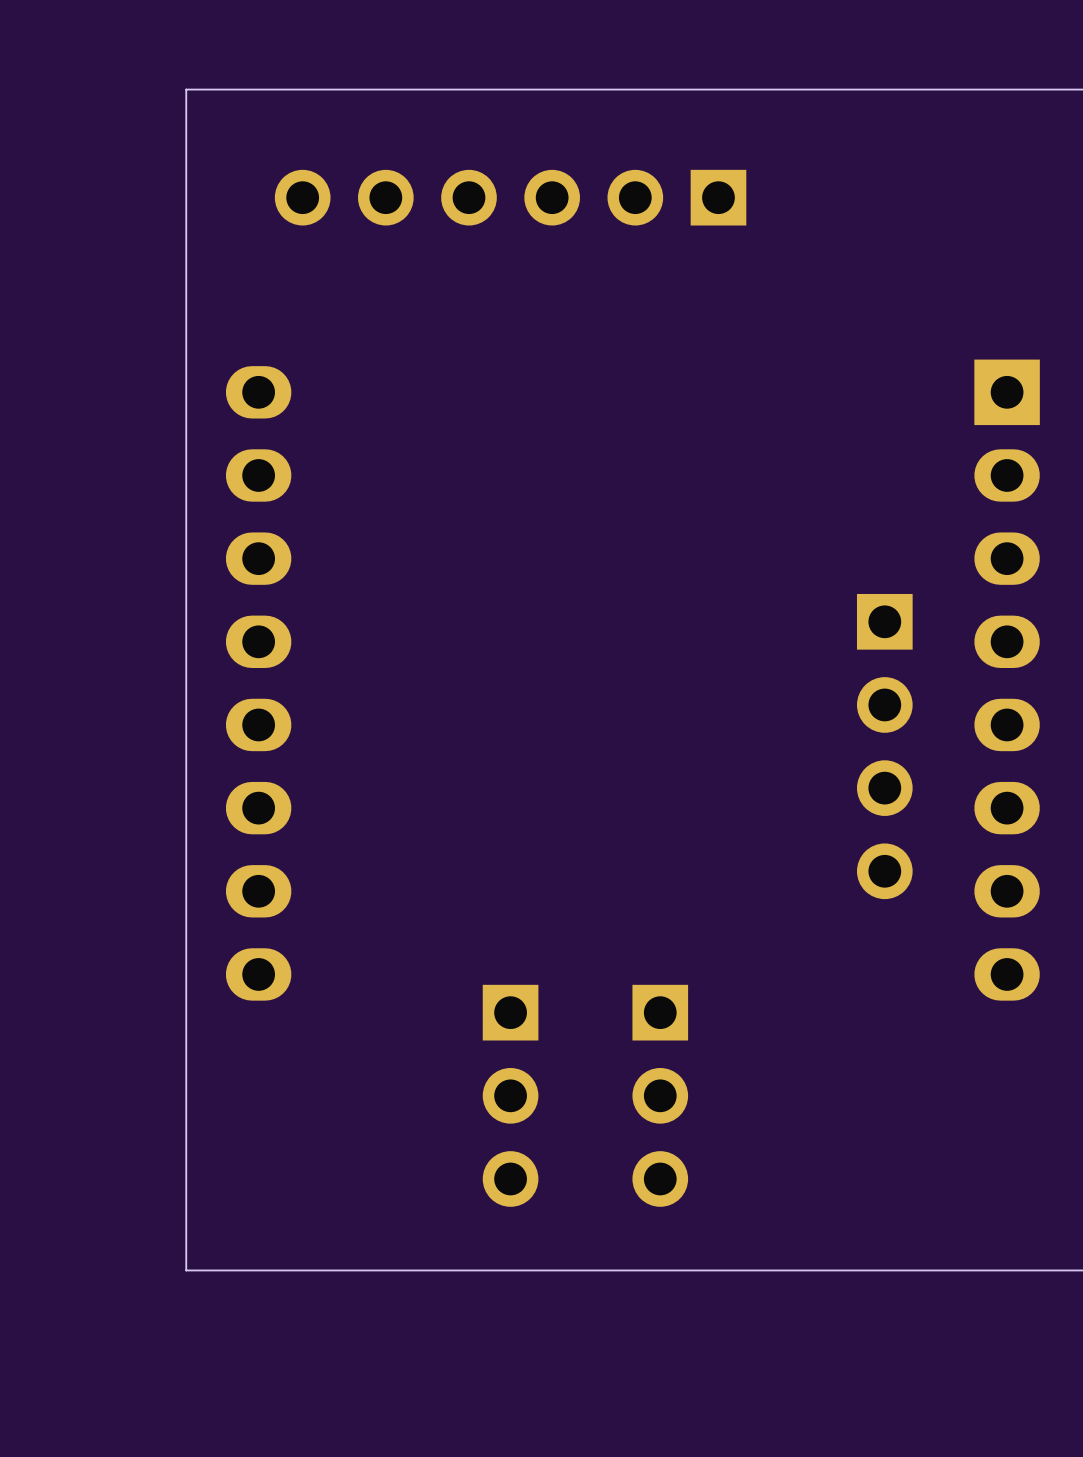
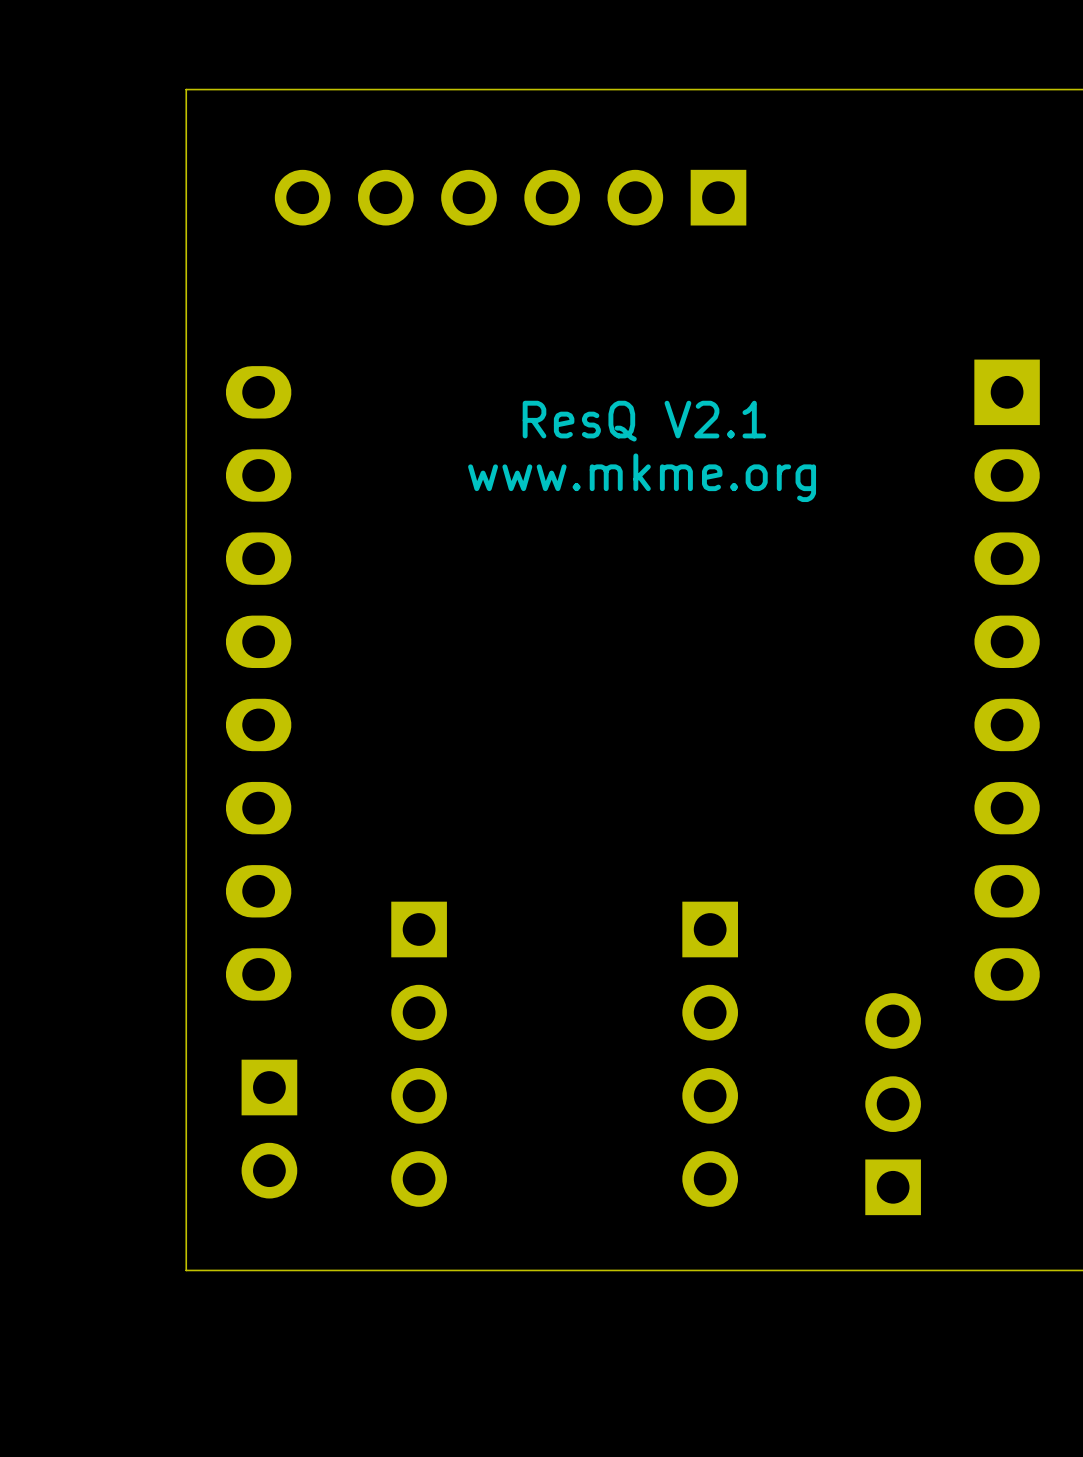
text: none -> ResQ V2.1 (644, 421)
text: none -> www.mkme.org (642, 477)
part: (884, 746) -> none
part: none -> (419, 1054)
part: none -> (710, 1054)
part: (510, 1095) -> none
part: (660, 1095) -> none
part: none -> (893, 1104)
part: none -> (269, 1129)

